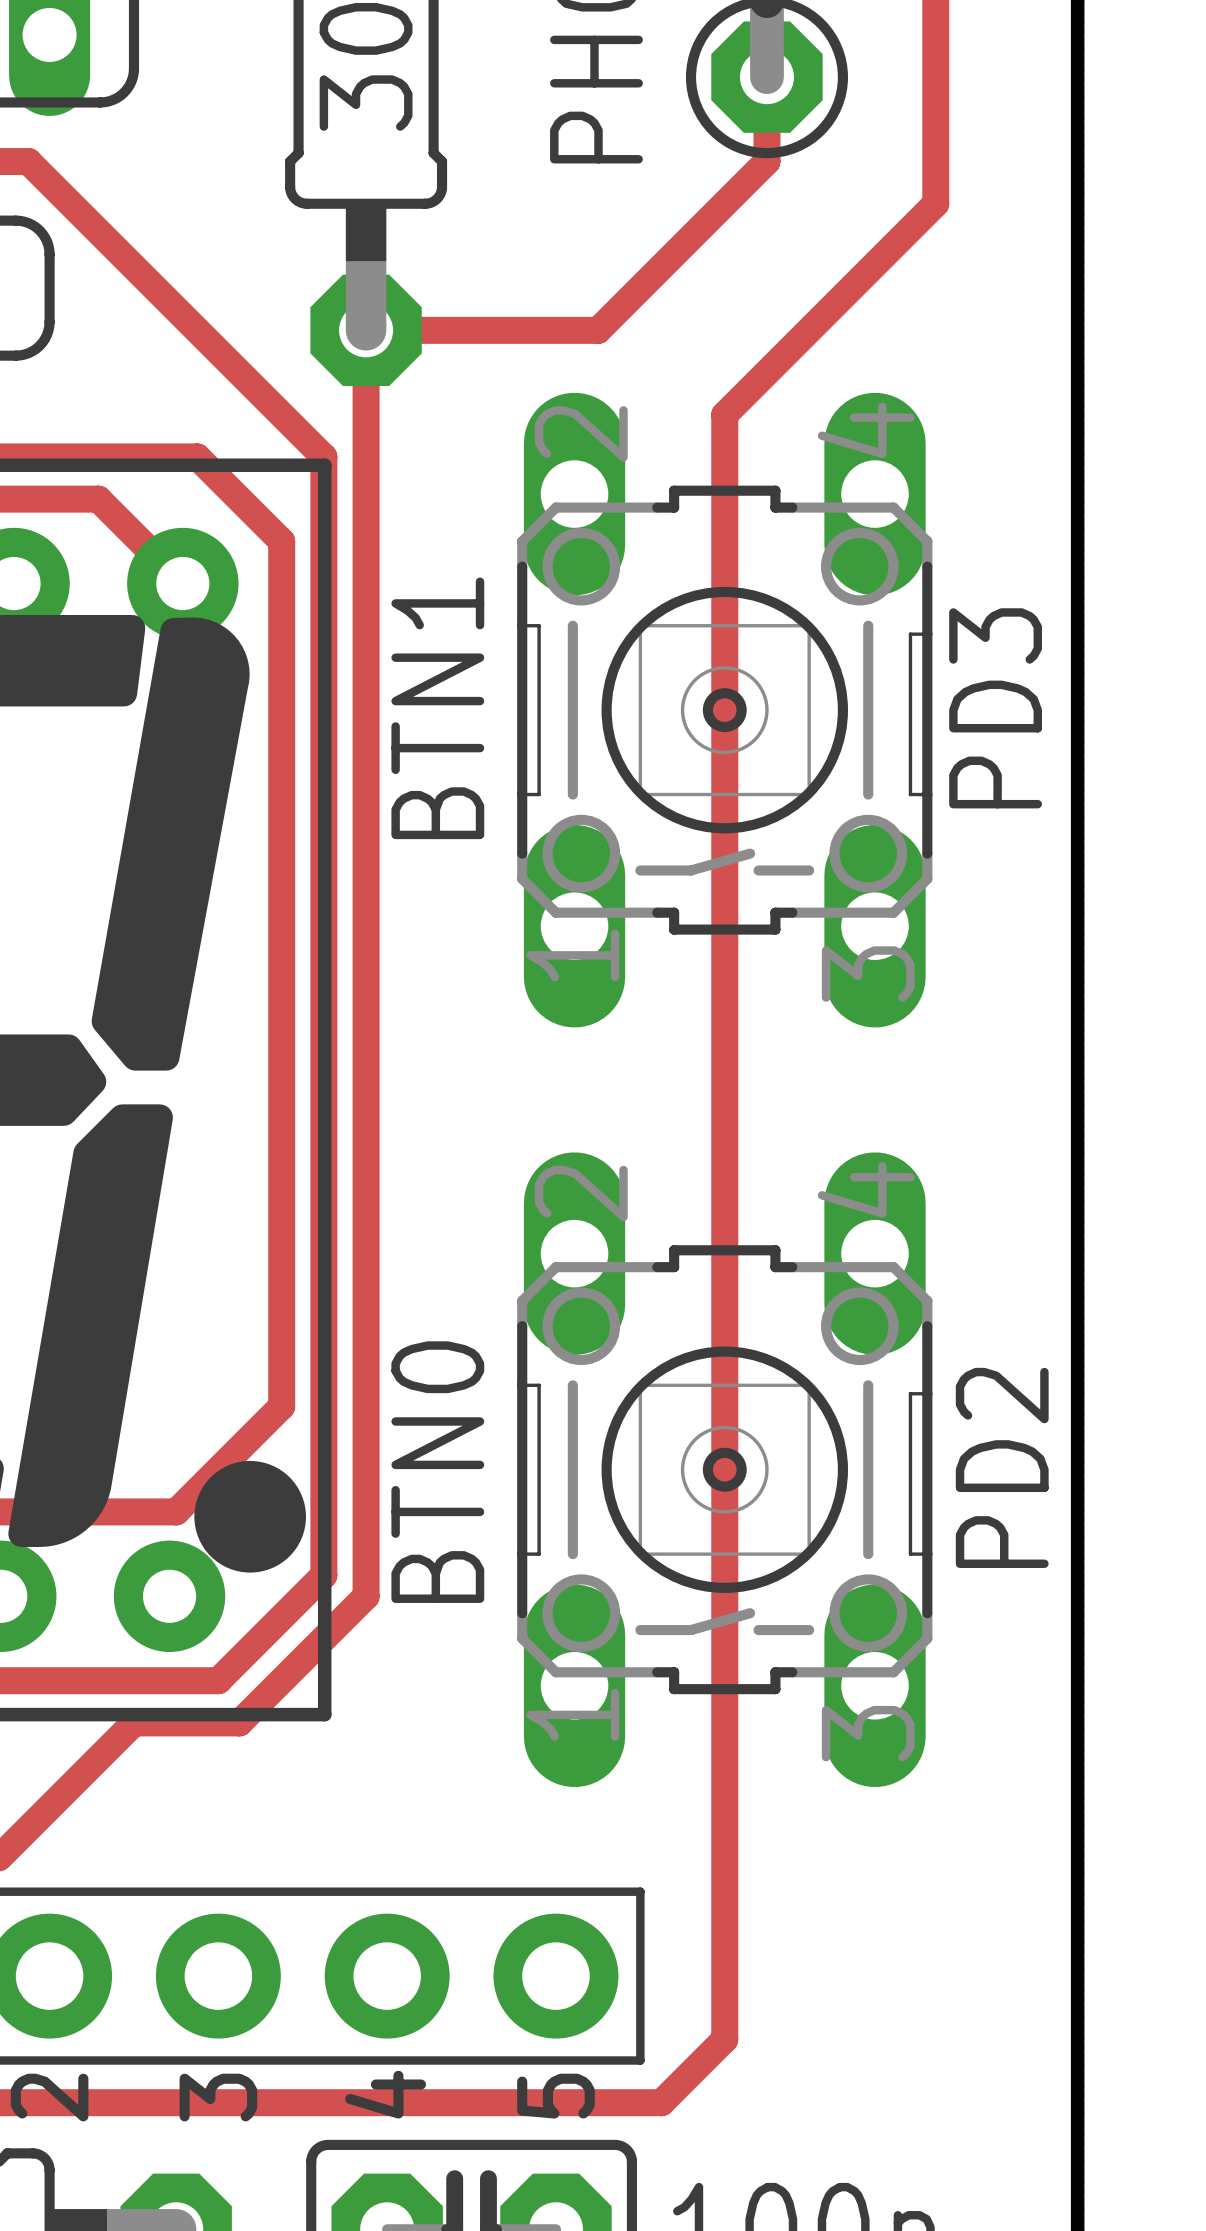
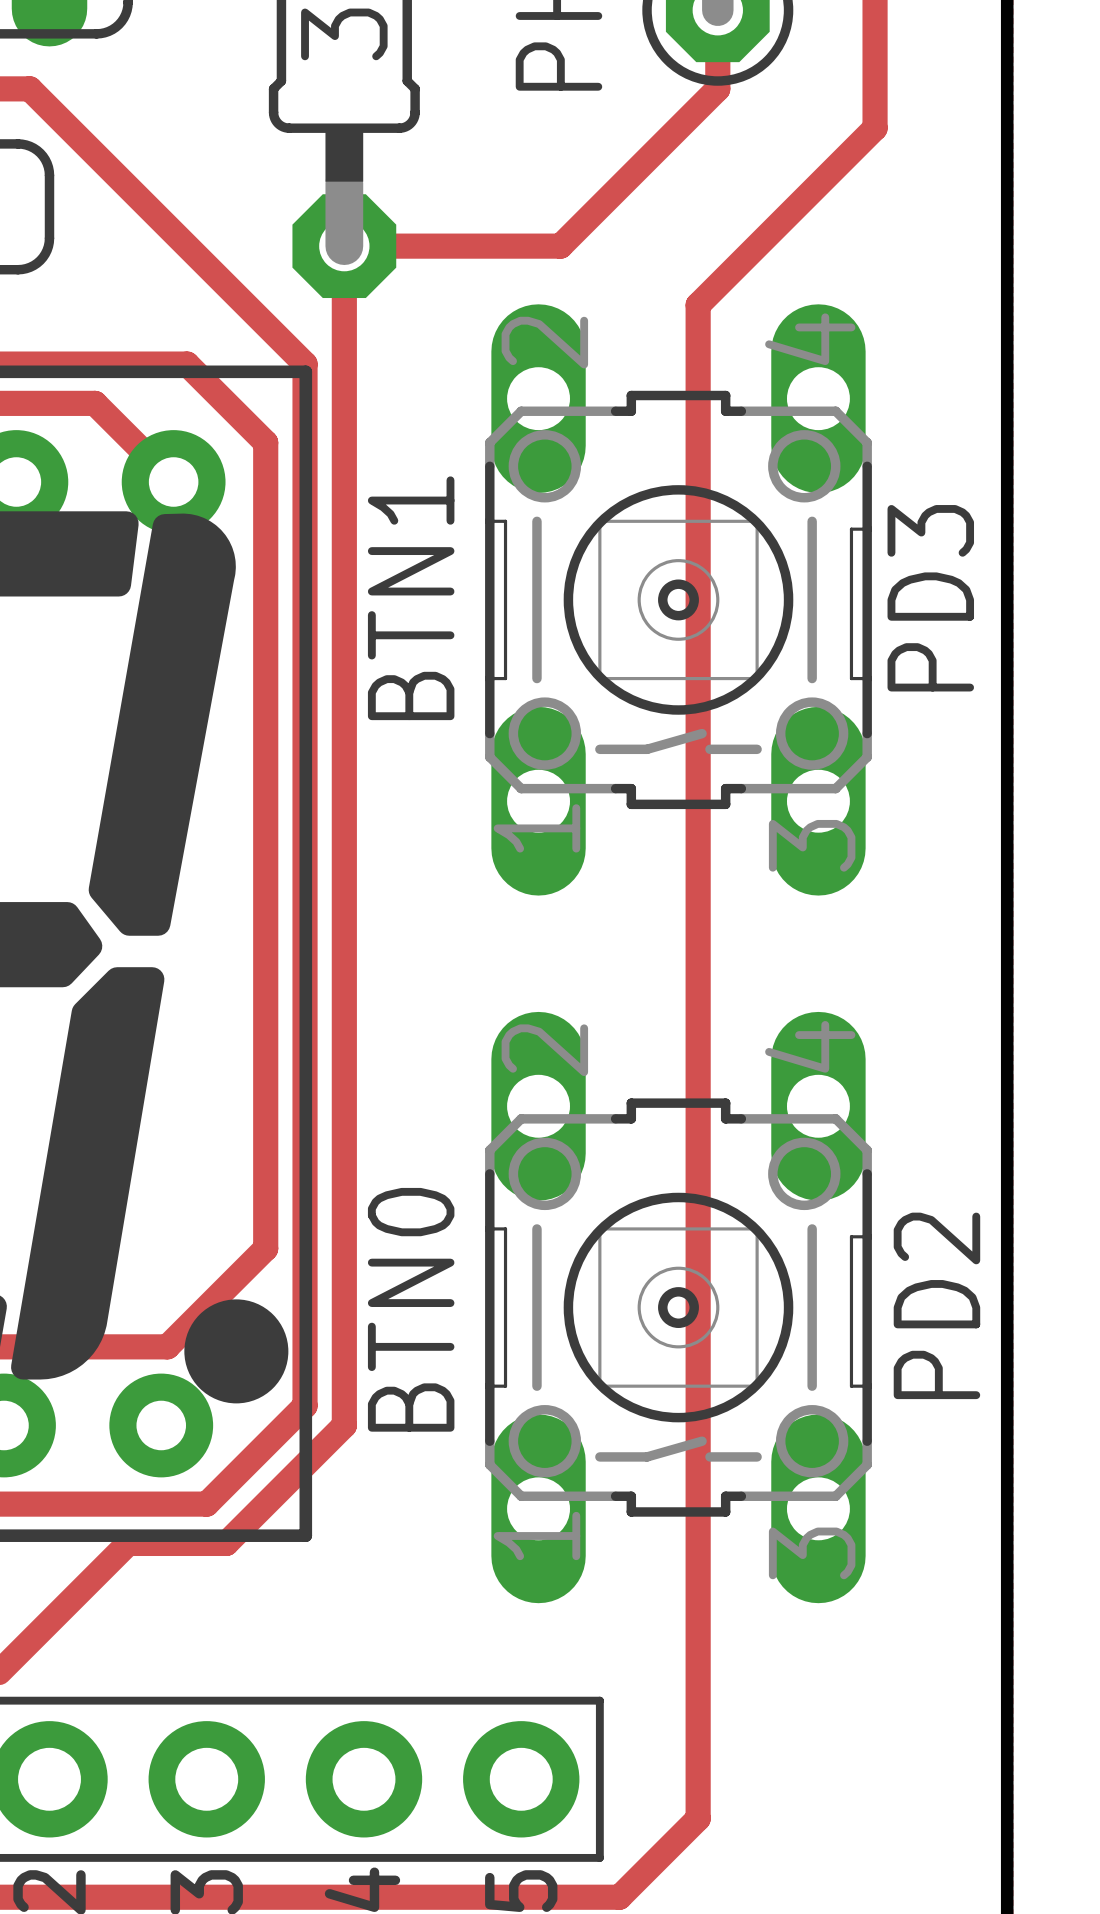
track: (745, 393) (724, 414) (724, 2039) -> (698, 305) (698, 1818) (678, 1838)

